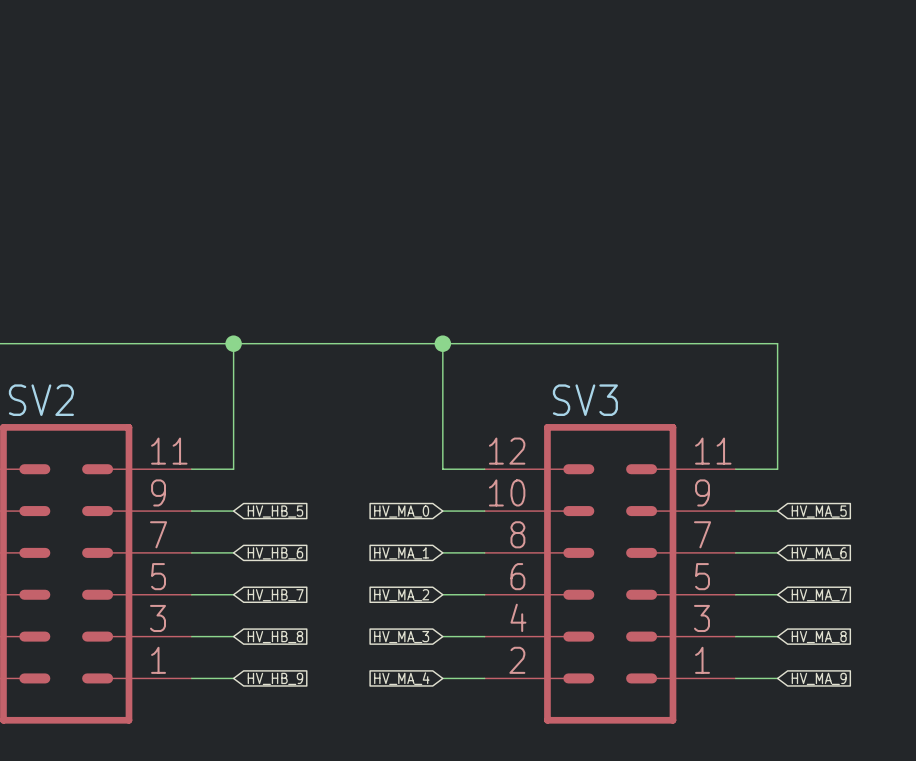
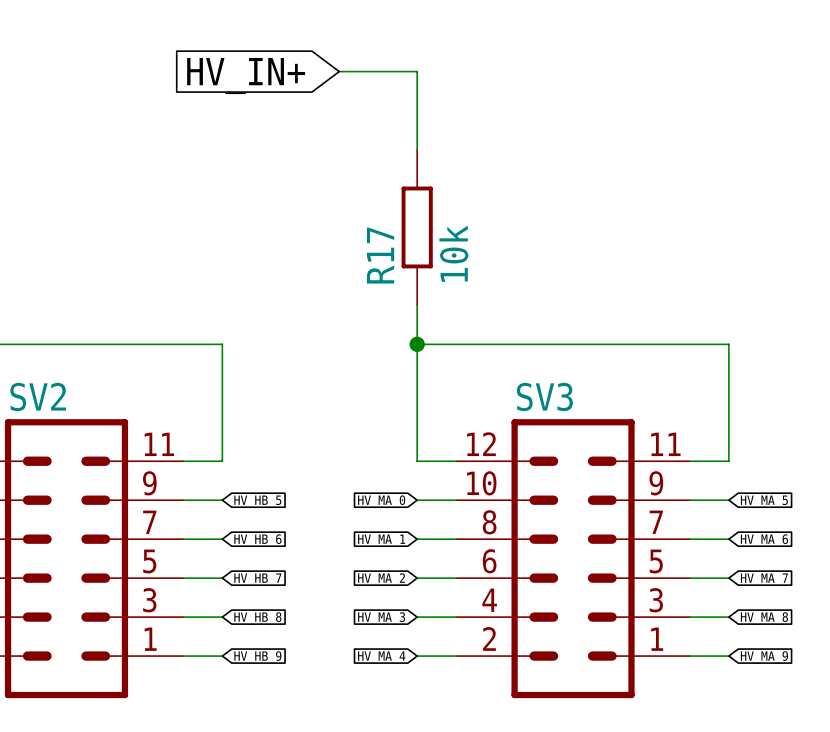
wire: none -> (339, 71) (417, 71) (417, 149)
global label: none -> HV_IN+ (246, 76)
R17: none -> 10k (417, 227)
wire: (233, 343) (442, 343) -> (417, 305) (417, 344)
junction: (233, 343) -> none

